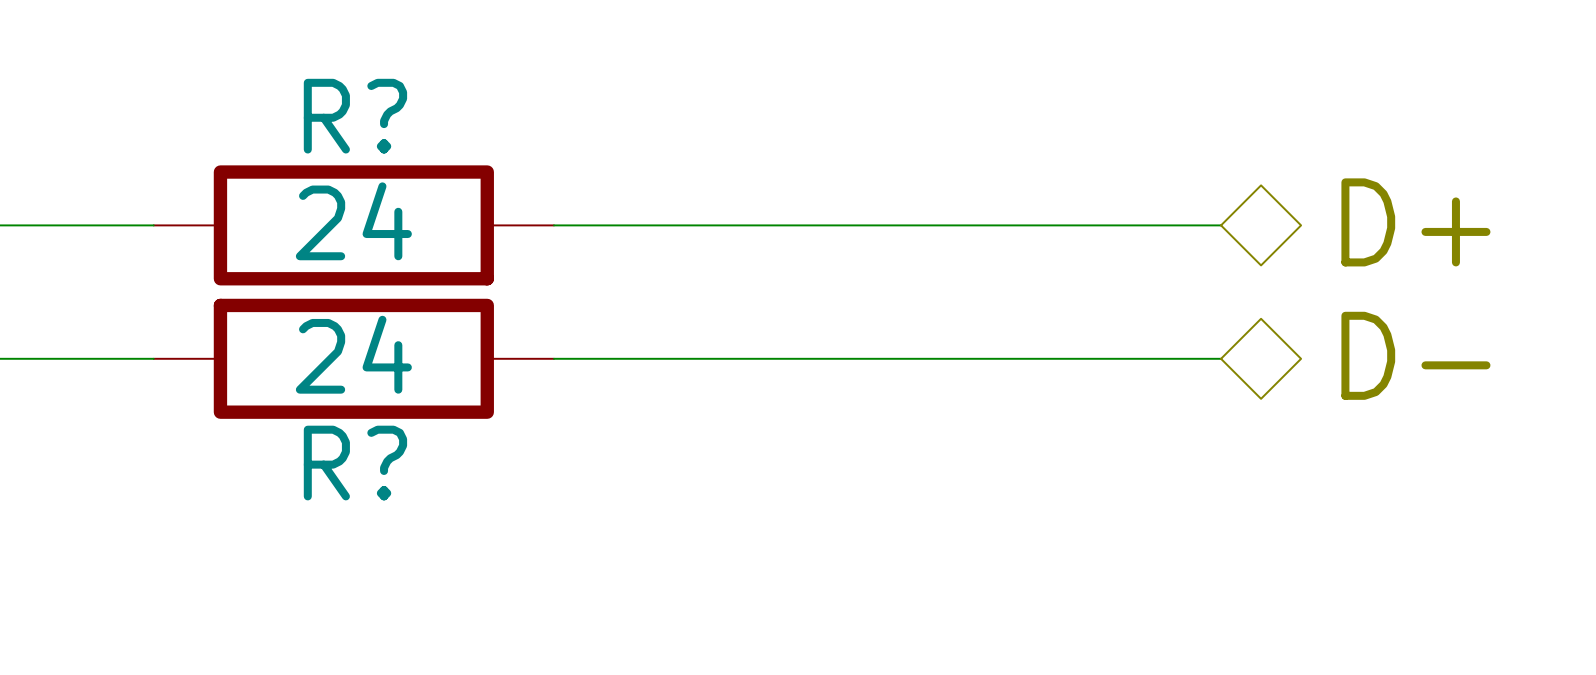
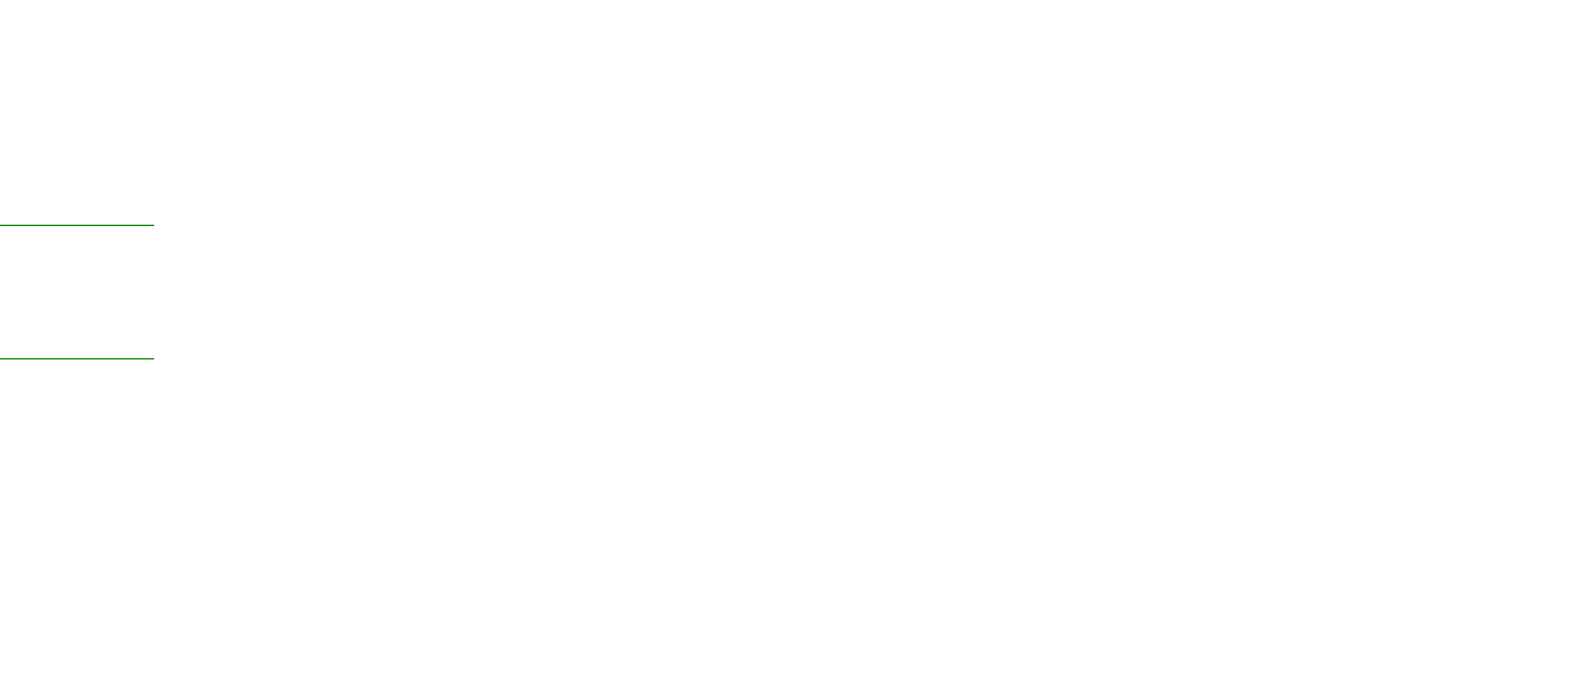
hierarchical label: D+ (1415, 222) -> none
R?: 24 (353, 225) -> none
wire: (553, 225) (1221, 225) -> none
hierarchical label: D- (1415, 355) -> none
R?: 24 (353, 358) -> none
wire: (553, 358) (1221, 358) -> none

